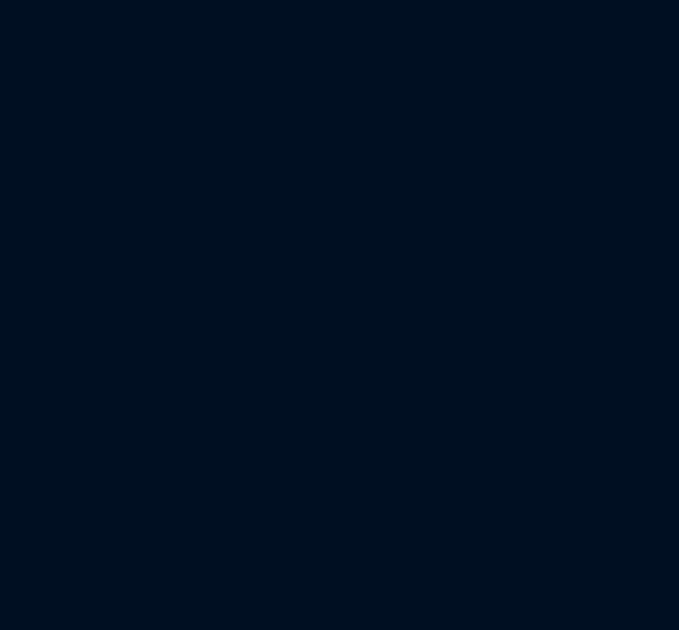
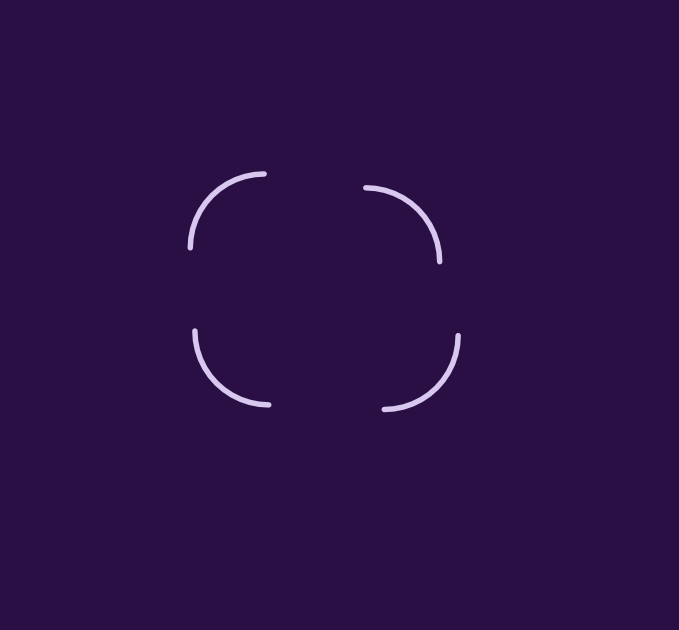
board edge: none -> (264, 173) (235, 179) (211, 195) (195, 219) (190, 247)
board edge: none -> (365, 187) (394, 193) (418, 209) (434, 233) (439, 261)
board edge: none -> (194, 330) (200, 359) (216, 383) (240, 399) (268, 404)
board edge: none -> (458, 335) (452, 363) (436, 387) (412, 403) (384, 409)

